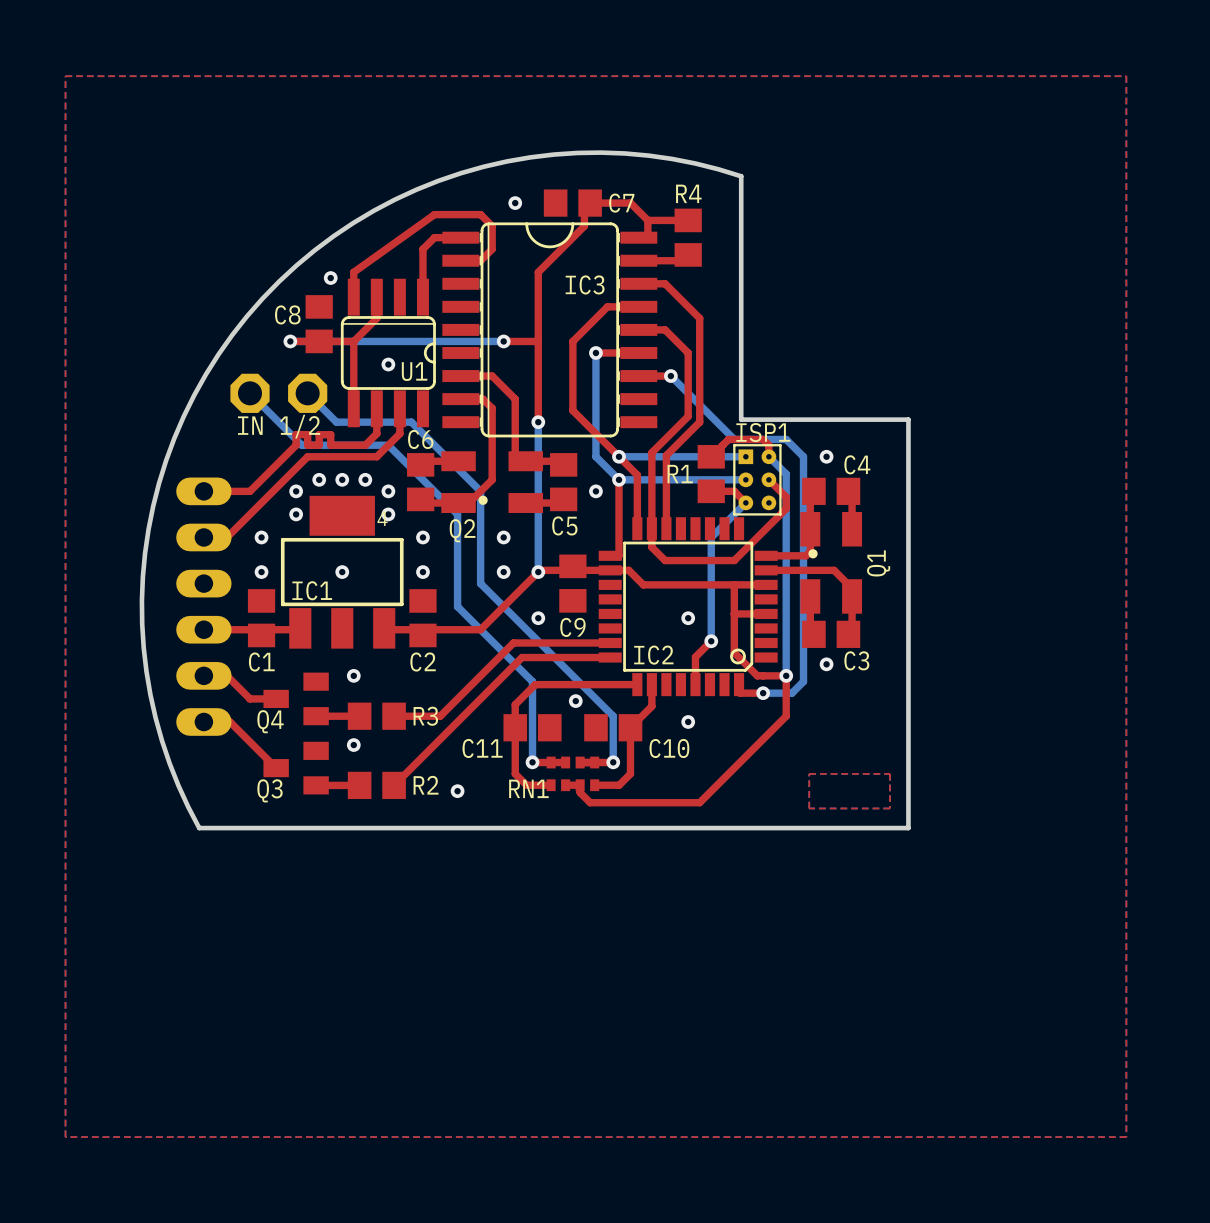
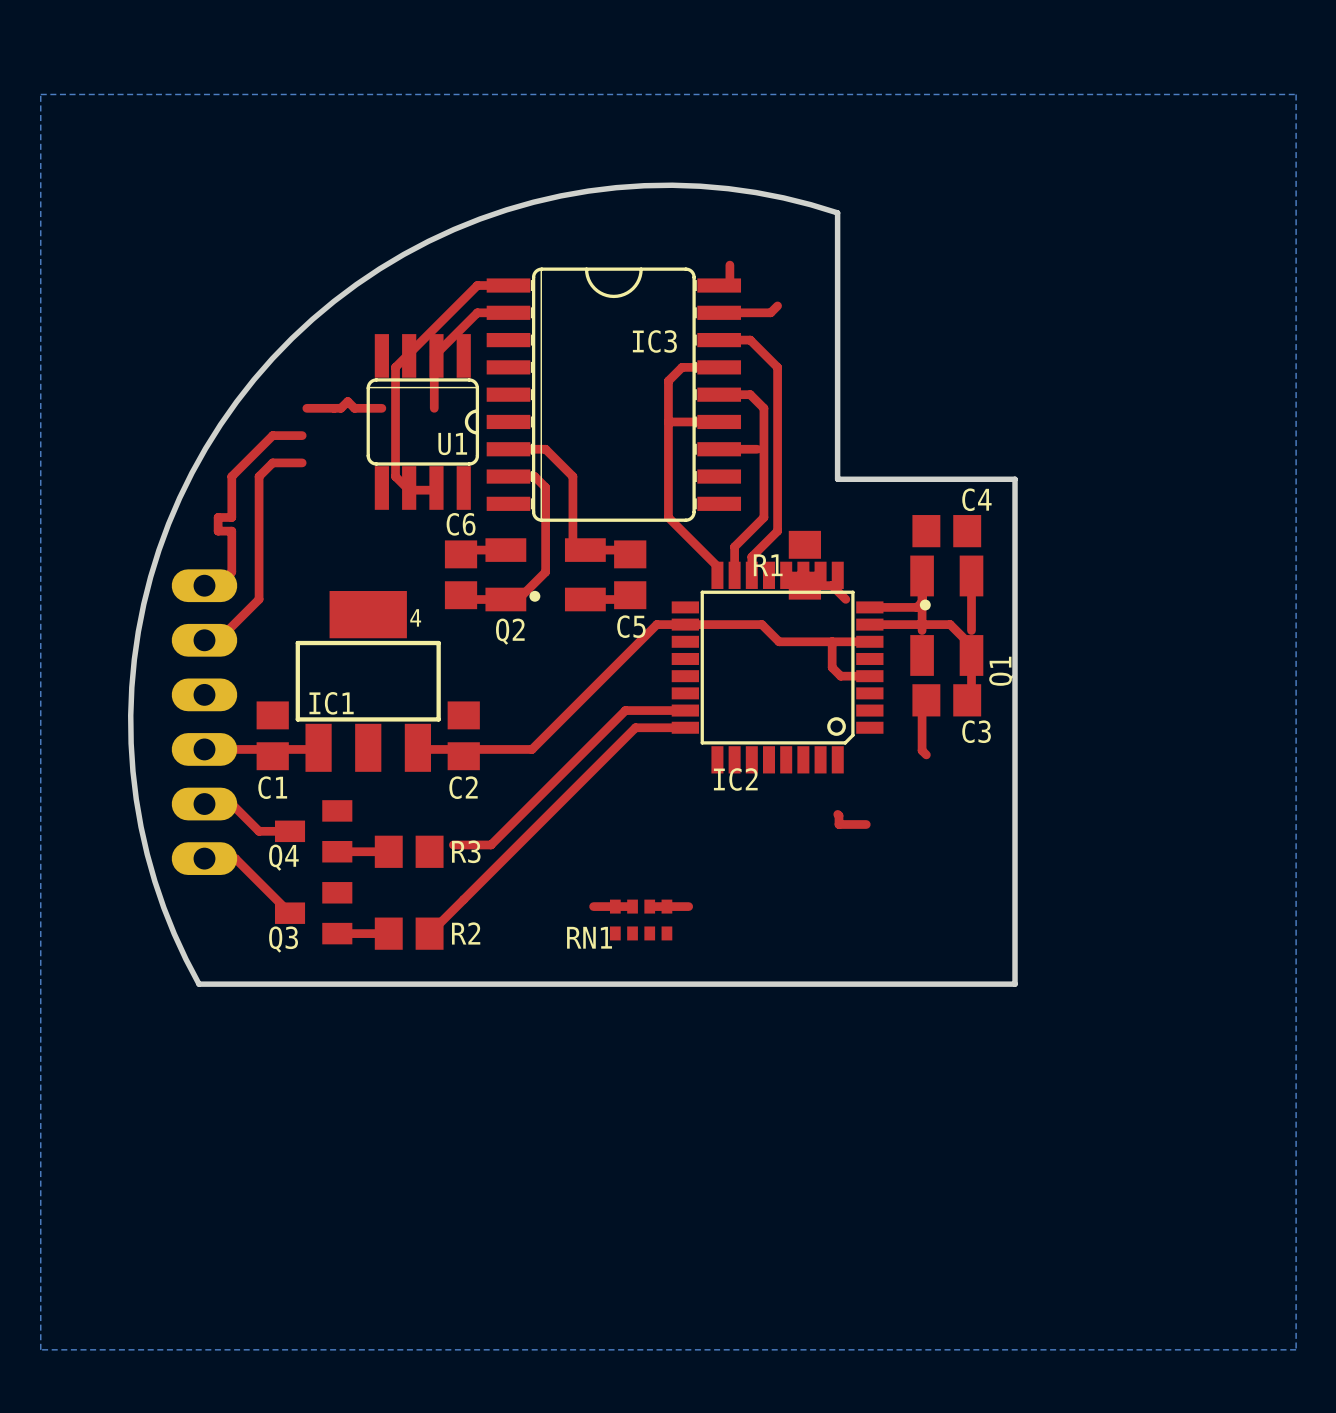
top zone outline: (65, 76) (1126, 76) (1126, 1137) (65, 1137) (65, 76) -> none
via: (515, 203) -> none
C7: (572, 203) -> none
top track: (688, 220) (647, 220) (630, 203) (590, 203) (584, 208) (584, 226) (538, 272) (538, 422) -> none
R4: (688, 237) -> none
top track: (422, 249) (422, 297) -> (463, 299) (395, 367) (395, 476) (409, 490) (434, 490)
top track: (460, 260) (480, 260) (492, 249) (492, 226) (480, 214) (434, 214) (353, 272) (353, 297) -> (508, 312) (477, 312) (434, 355) (434, 408)
via: (330, 278) -> none
top track: (376, 297) (376, 318) (353, 341) (353, 408) -> none
top track: (688, 306) (699, 318) (699, 422) (666, 455) (666, 467) -> none
top track: (595, 318) (572, 341) (572, 410) (595, 433) -> (668, 381) (668, 517)
C8: (319, 324) -> none
bottom track: (290, 341) (503, 341) -> none
via: (290, 341) -> none
top track: (503, 341) (538, 341) -> none
via: (503, 341) -> none
top track: (676, 341) (688, 352) -> (777, 367) (777, 421)
top track: none -> (763, 408) (763, 517) (734, 546)
bottom track: (595, 352) (595, 456) (619, 479) (745, 479) -> none
via: (595, 352) -> none
via: (388, 364) -> none
bottom track: (670, 376) (734, 439) (786, 439) (803, 456) (803, 681) (791, 693) (763, 693) -> none
via: (670, 376) -> none
bottom track: (250, 393) (301, 445) (388, 445) (457, 514) (457, 606) (532, 681) (532, 762) -> none
part: (250, 393) -> none
bottom track: (307, 393) (336, 422) (411, 422) (480, 491) (480, 583) (613, 716) (613, 762) -> none
part: (307, 393) -> none
board edge: none -> (837, 479) (1015, 479) (1015, 984)
top track: (376, 408) (376, 433) (365, 445) (330, 445) (330, 434) (319, 434) (319, 445) (307, 445) (307, 434) (296, 434) (296, 445) (250, 491) (215, 491) -> (302, 435) (272, 435) (231, 476) (231, 517) (218, 517) (218, 531) (231, 531) (231, 572) (218, 585)
top track: (399, 408) (399, 433) (376, 456) (307, 456) (226, 537) (215, 537) -> (302, 462) (272, 462) (259, 476) (259, 599) (218, 640)
top track: (688, 416) (651, 452) (651, 458) -> (777, 497) (777, 531) (751, 556)
bottom track: (538, 422) (538, 572) -> none
via: (538, 422) -> none
text: IN 1/2 (279, 426) -> none
bottom track: (619, 456) (745, 456) -> none
via: (619, 456) -> none
top track: (768, 456) (768, 445) (763, 439) (728, 439) (711, 456) -> none
bottom track: (768, 456) (786, 474) (786, 675) -> none
via: (826, 456) -> none
via: (319, 479) -> none
via: (342, 479) -> none
via: (365, 479) -> none
top track: (619, 479) (619, 555) (610, 555) -> none
via: (619, 479) -> none
ISP1: (757, 479) -> none
top track: (768, 479) (786, 497) (786, 508) (734, 560) (665, 560) (651, 547) (651, 482) -> none
top track: (637, 482) (637, 528) -> none
top track: (666, 482) (666, 528) -> none
via: (296, 491) -> none
via: (388, 491) -> none
via: (595, 491) -> none
C4 position: (831, 491) -> (946, 531)
bottom track: (745, 502) (711, 537) (711, 641) -> none
via: (296, 514) -> none
via: (388, 514) -> none
top track: (810, 529) (810, 551) (805, 555) (766, 555) -> (922, 576) (922, 602) (916, 607) (869, 607)
via: (261, 537) -> none
via: (422, 537) -> none
via: (503, 537) -> none
top track: none -> (832, 641) (832, 667) (840, 676) (869, 676)
Q1 position: (831, 562) -> (946, 615)
top track: (540, 570) (628, 570) (643, 584) (766, 584) -> (602, 679) (656, 624) (761, 624) (779, 641) (869, 641)
top track: (766, 570) (834, 570) (849, 585) (849, 594) (852, 596) (852, 630) (848, 634) -> (869, 624) (950, 624) (968, 643) (968, 652) (971, 655) (971, 696) (967, 700)
via: (261, 572) -> none
via: (342, 572) -> none
via: (422, 572) -> none
via: (503, 572) -> none
via: (538, 572) -> none
C9: (572, 583) -> none
top track: (734, 584) (734, 652) (757, 675) (786, 675) (786, 716) (699, 802) (590, 802) (580, 792) (580, 785) (565, 785) -> none
IC2 position: (688, 606) -> (777, 667)
top track: (734, 613) (766, 613) -> none
via: (538, 618) -> none
via: (688, 618) -> none
C3 position: (831, 634) -> (946, 700)
top track: (711, 641) (695, 657) (695, 684) -> none
via: (711, 641) -> none
top track: (513, 642) (610, 642) -> (570, 765) (625, 710) (685, 710)
top track: (521, 657) (610, 657) -> (580, 782) (635, 727) (685, 727)
via: (826, 664) -> none
via: (353, 675) -> none
via: (786, 675) -> none
top track: (637, 684) (535, 684) (515, 704) (515, 727) -> none
top track: (651, 684) (651, 706) (630, 727) (630, 773) (619, 785) (594, 785) -> none
via: (763, 693) -> none
via: (575, 701) -> none
top track: (446, 710) (440, 716) (394, 716) -> (491, 844) (453, 844)
via: (688, 721) -> none
top track: (515, 727) (515, 773) (526, 785) (551, 785) -> none
C11: (532, 727) -> none
C10: (613, 727) -> none
via: (353, 745) -> none
via: (532, 762) -> none
via: (613, 762) -> none
top zone outline: (809, 773) (889, 773) (889, 808) (809, 808) (809, 773) -> none
via: (457, 791) -> none
board edge: (199, 828) (169, 763) (155, 718) (146, 671) (141, 600) (145, 553) (159, 483) (174, 438) (205, 374) (232, 335) (279, 281) (314, 250) (373, 210) (438, 180) (483, 166) (553, 154) (601, 152) (672, 158) (741, 176) (741, 419) (908, 419) (908, 828) (888, 828) -> (199, 984) (174, 933) (154, 881) (136, 799) (130, 715) (138, 631) (158, 550) (179, 498) (205, 448) (254, 379) (291, 338) (334, 301) (379, 268) (428, 241) (506, 209) (560, 195) (616, 187) (700, 186) (756, 192) (837, 212) (837, 479)

